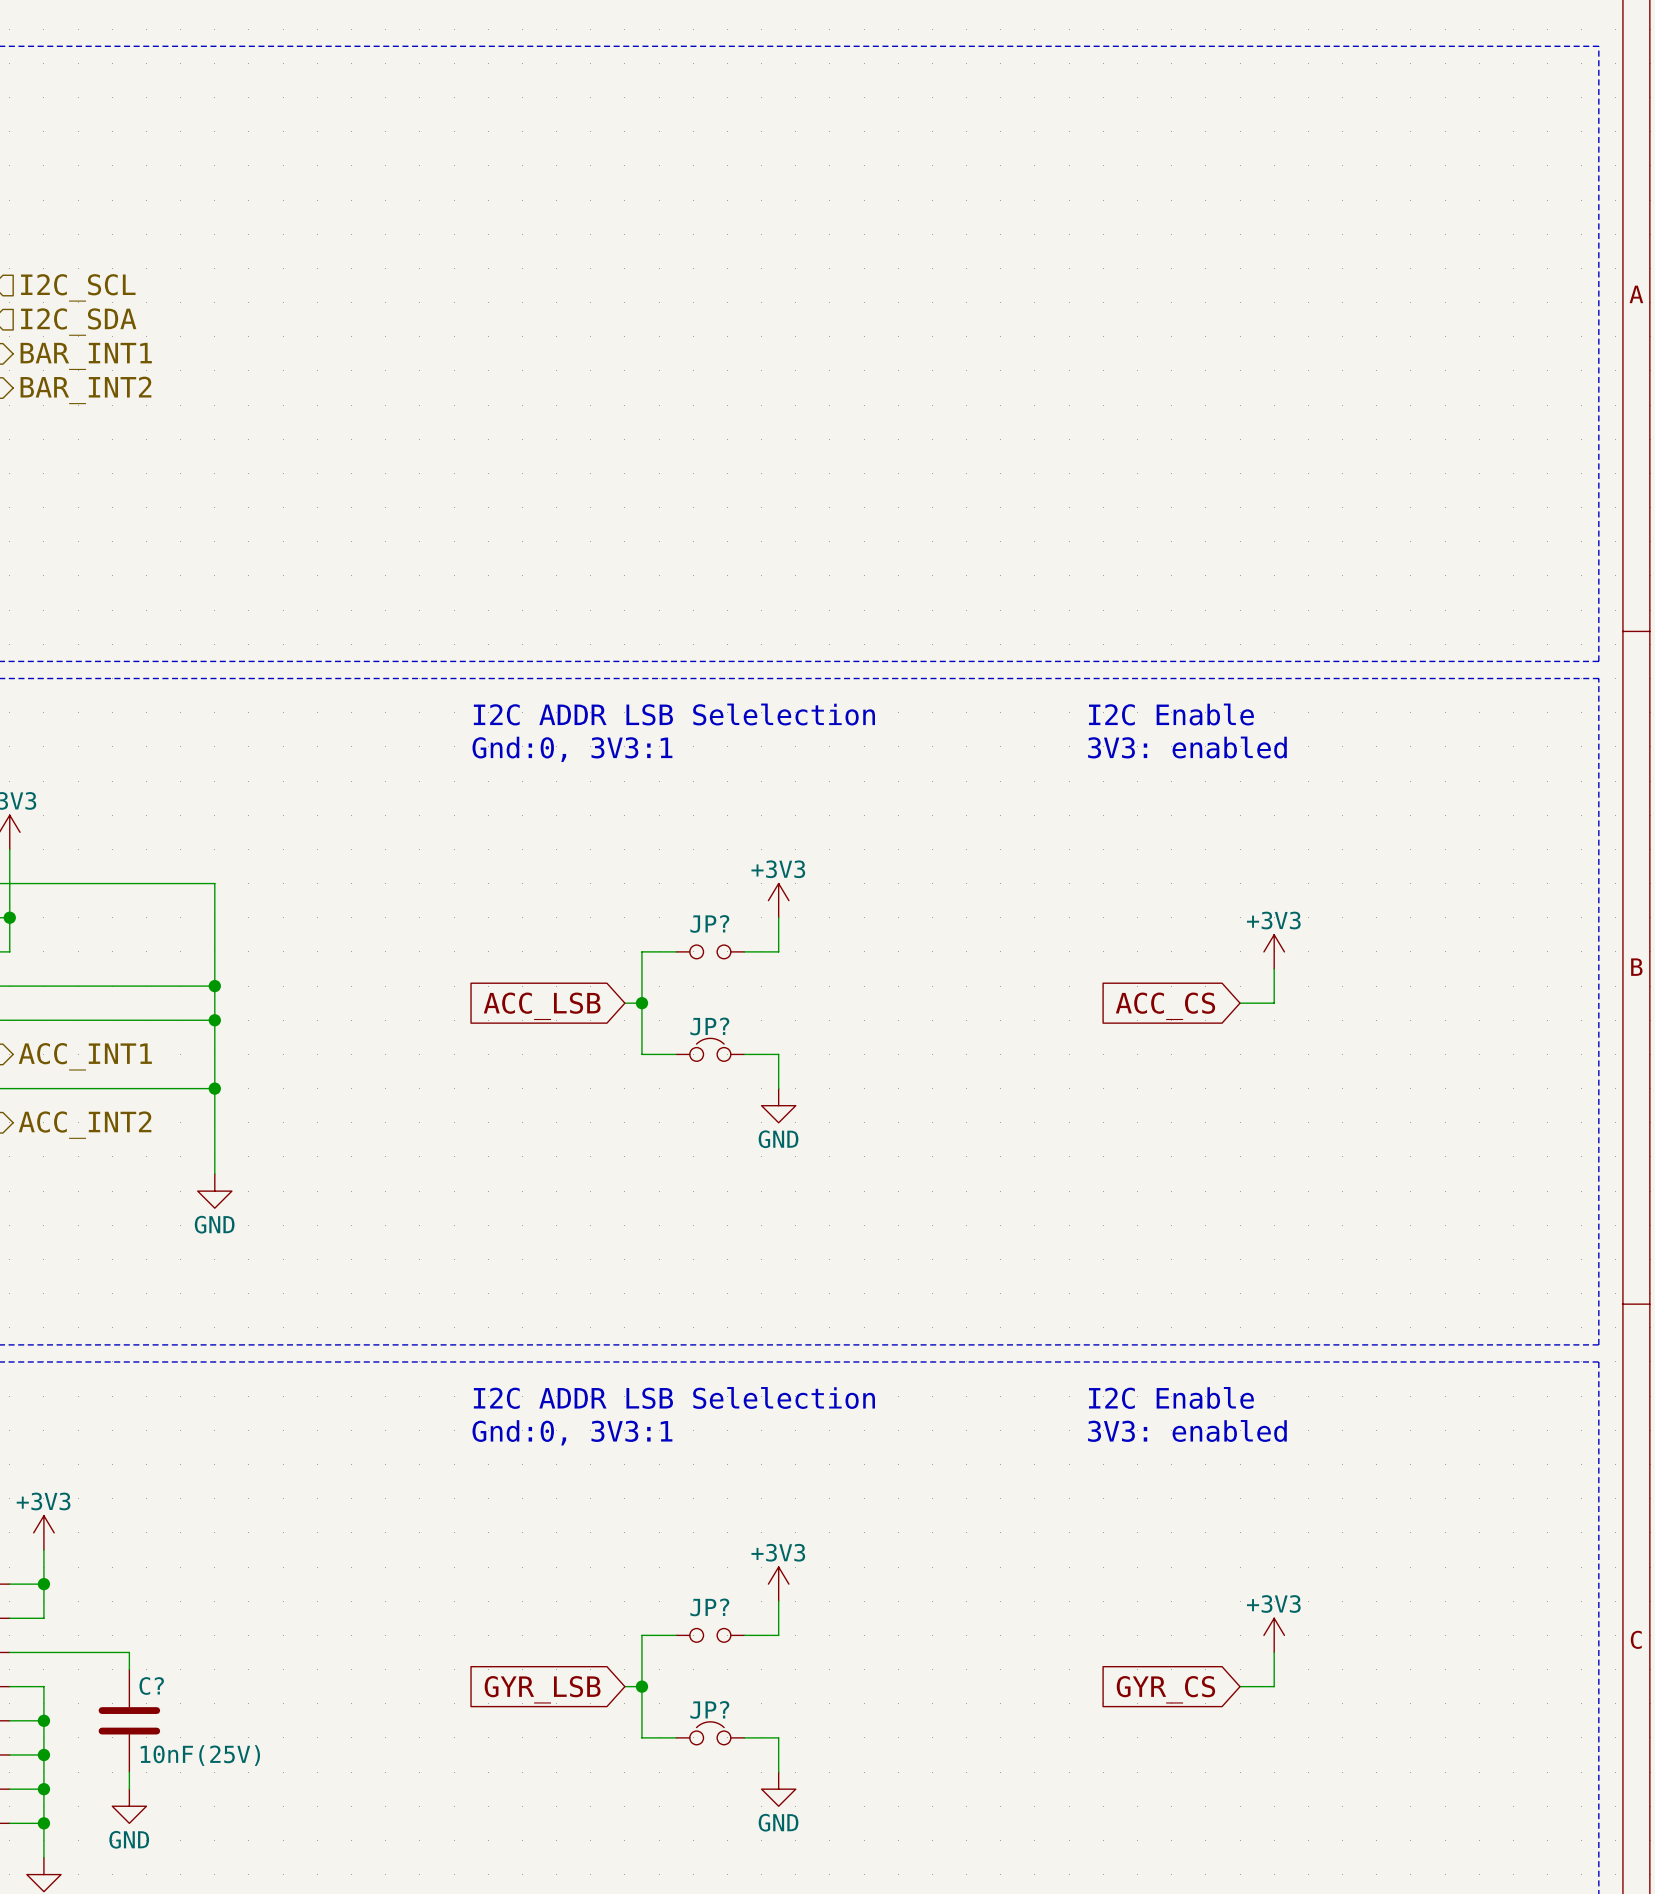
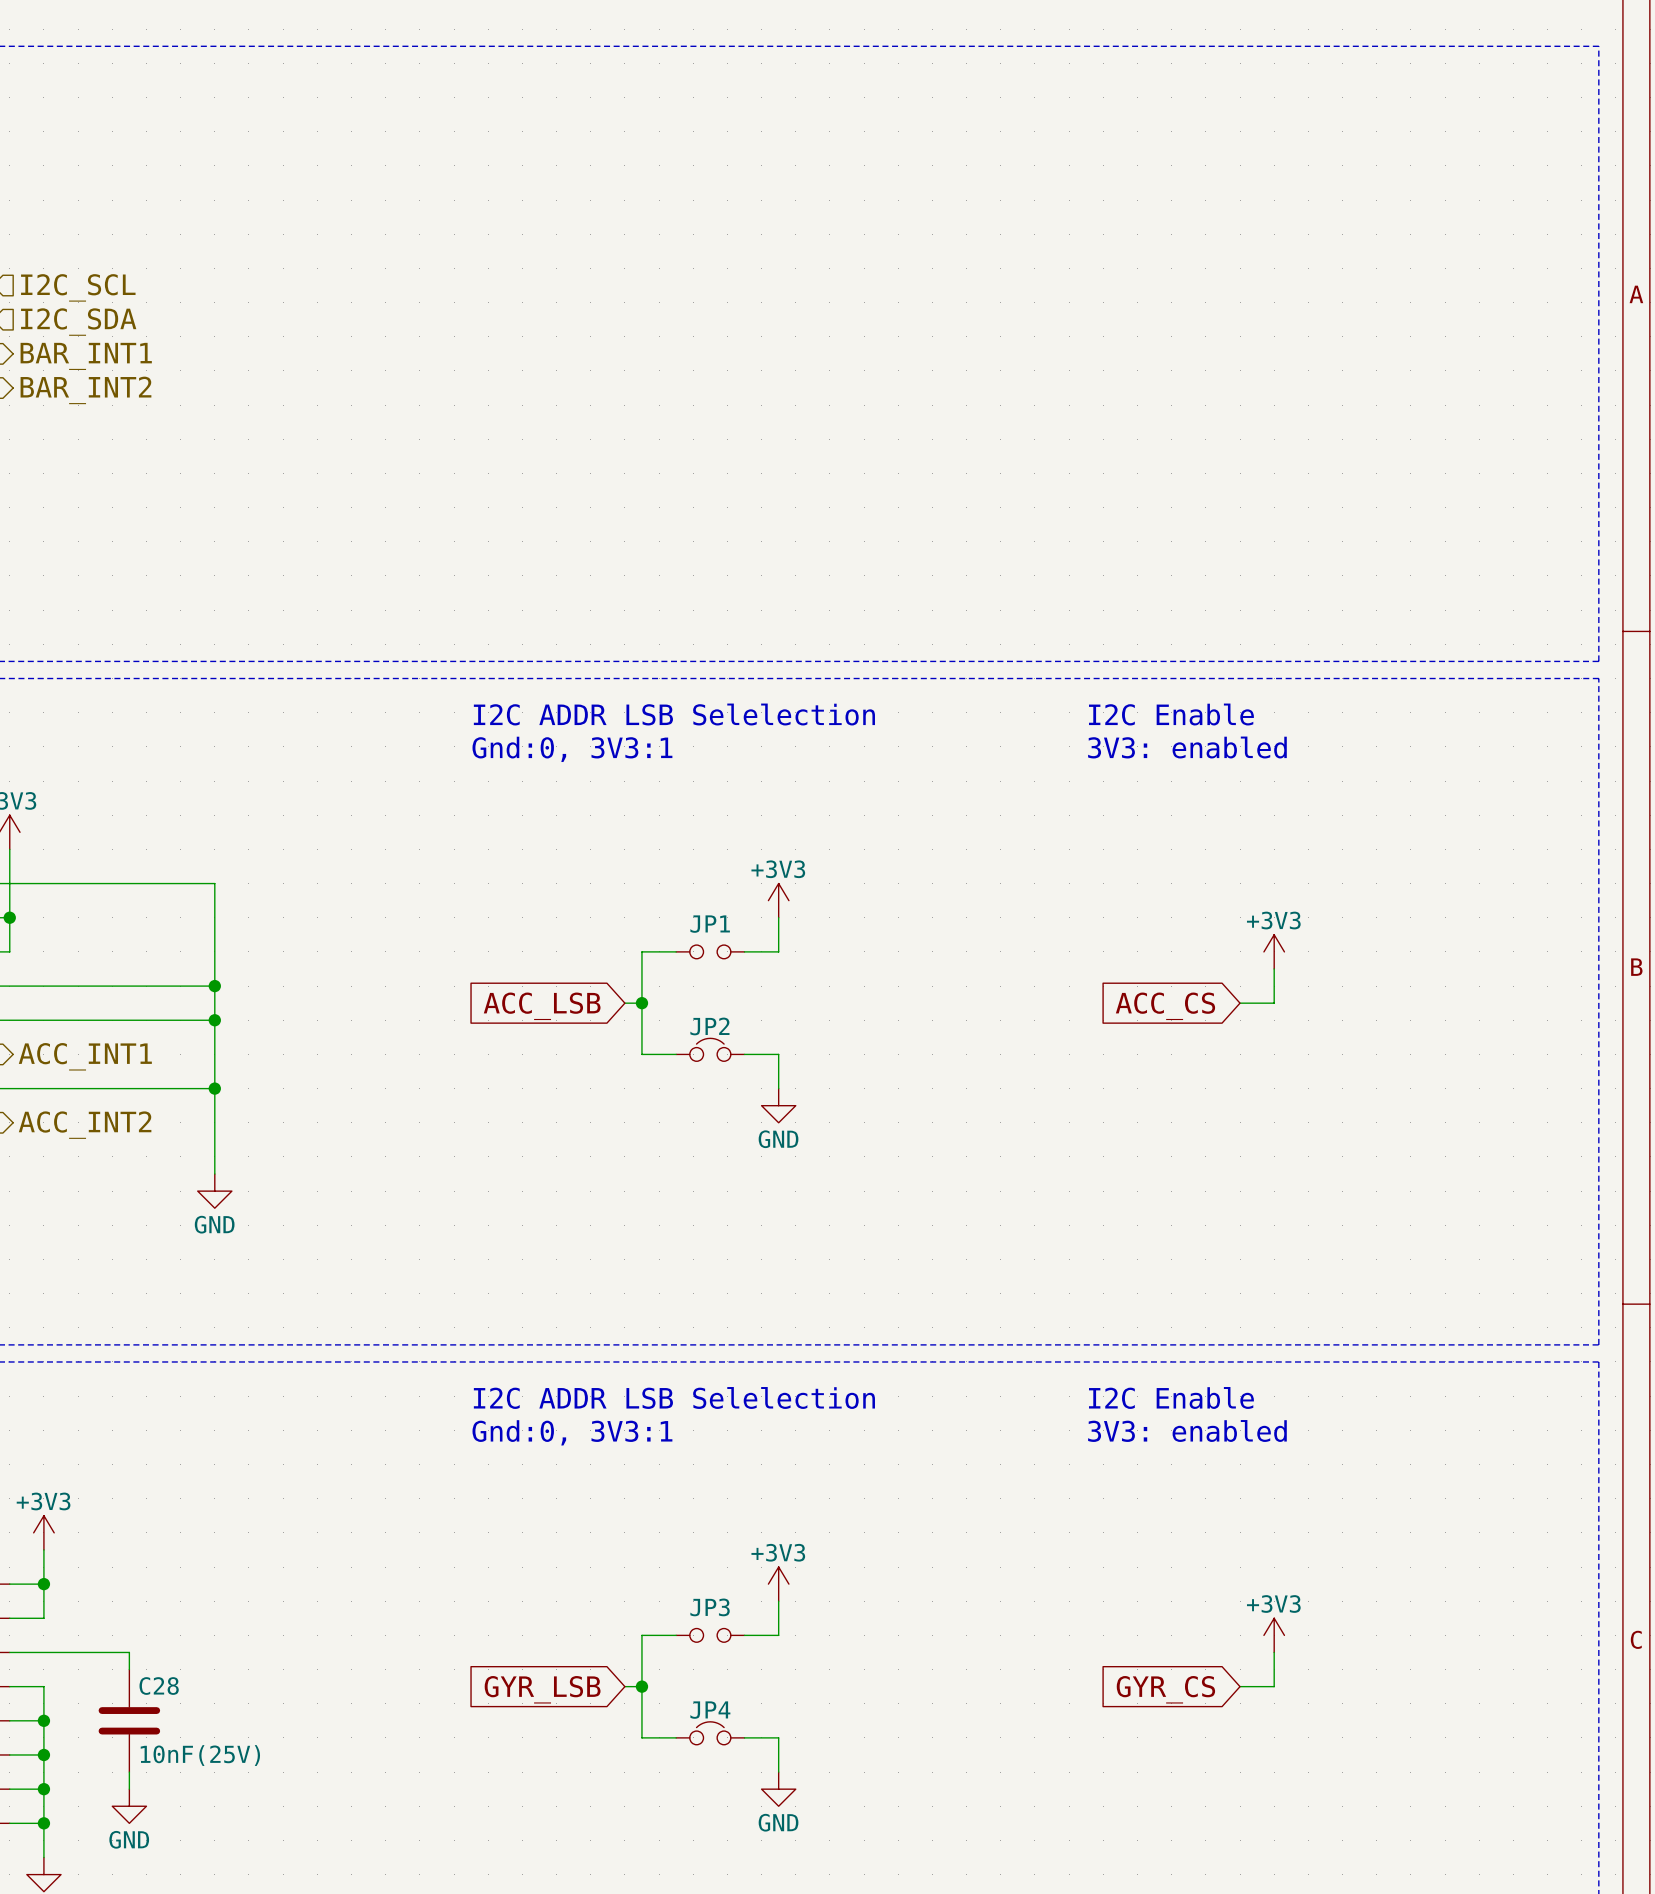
JP? name: JP? (709, 923) -> JP1 (710, 924)
JP? name: JP? (709, 1026) -> JP2 (709, 1026)
JP? name: JP? (709, 1607) -> JP3 (710, 1607)
C? name: C? (151, 1686) -> C28 (159, 1686)
JP? name: JP? (709, 1709) -> JP4 (710, 1710)

